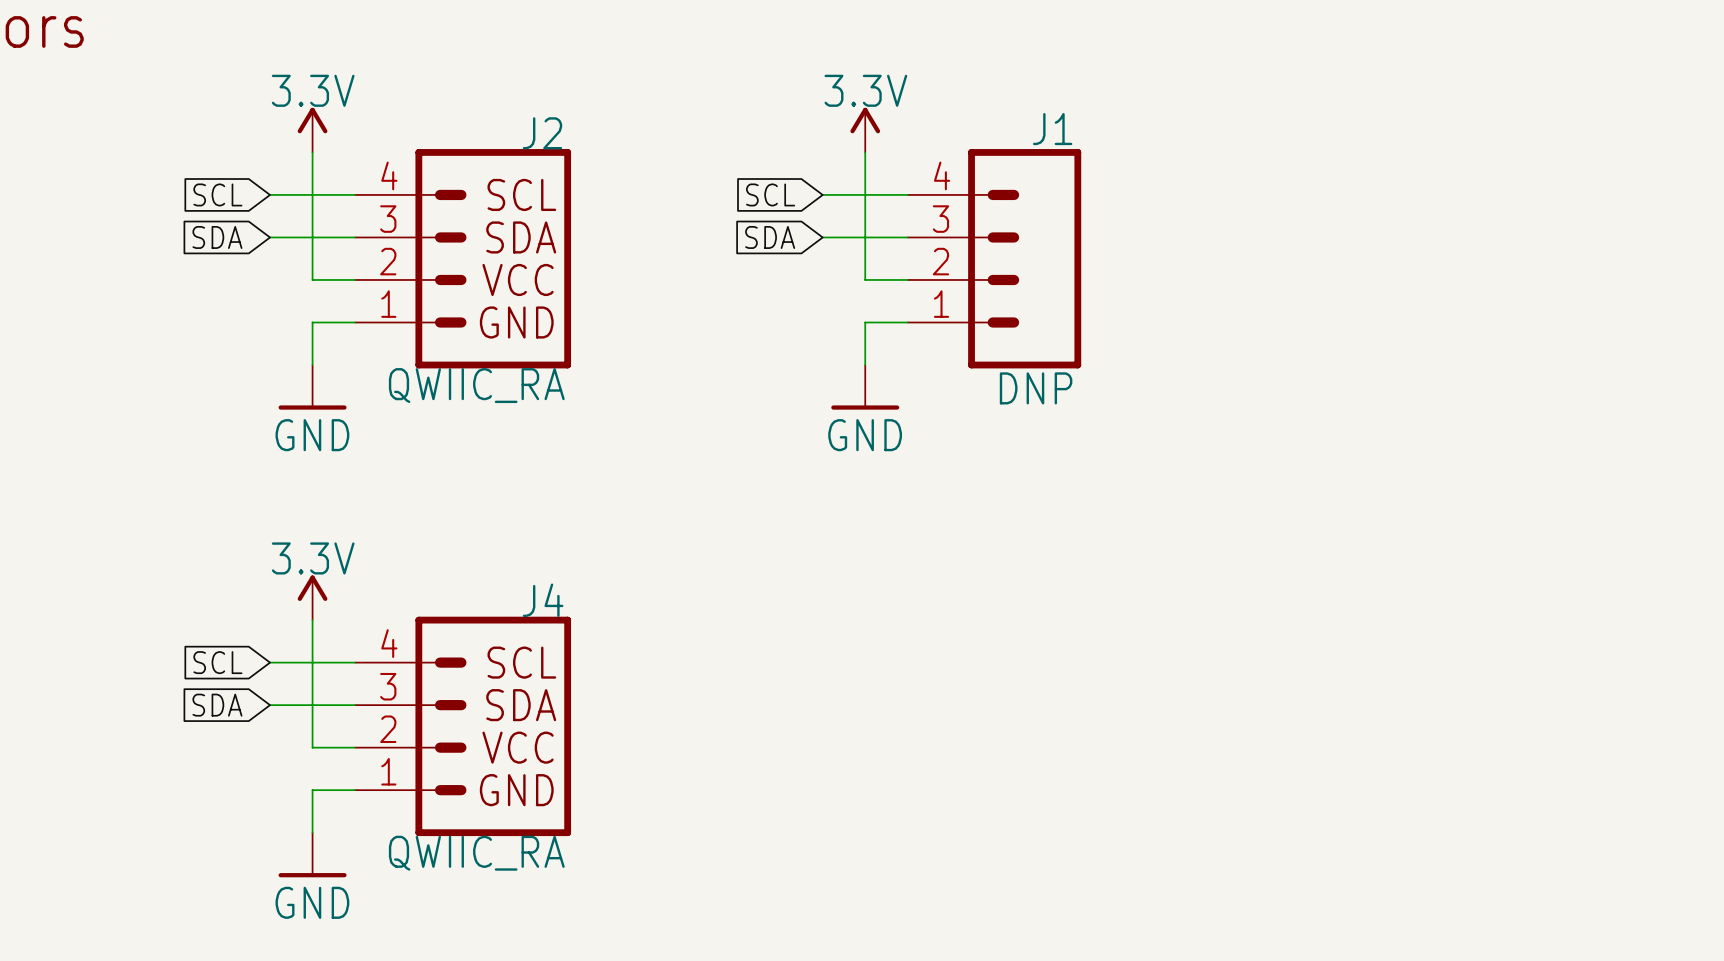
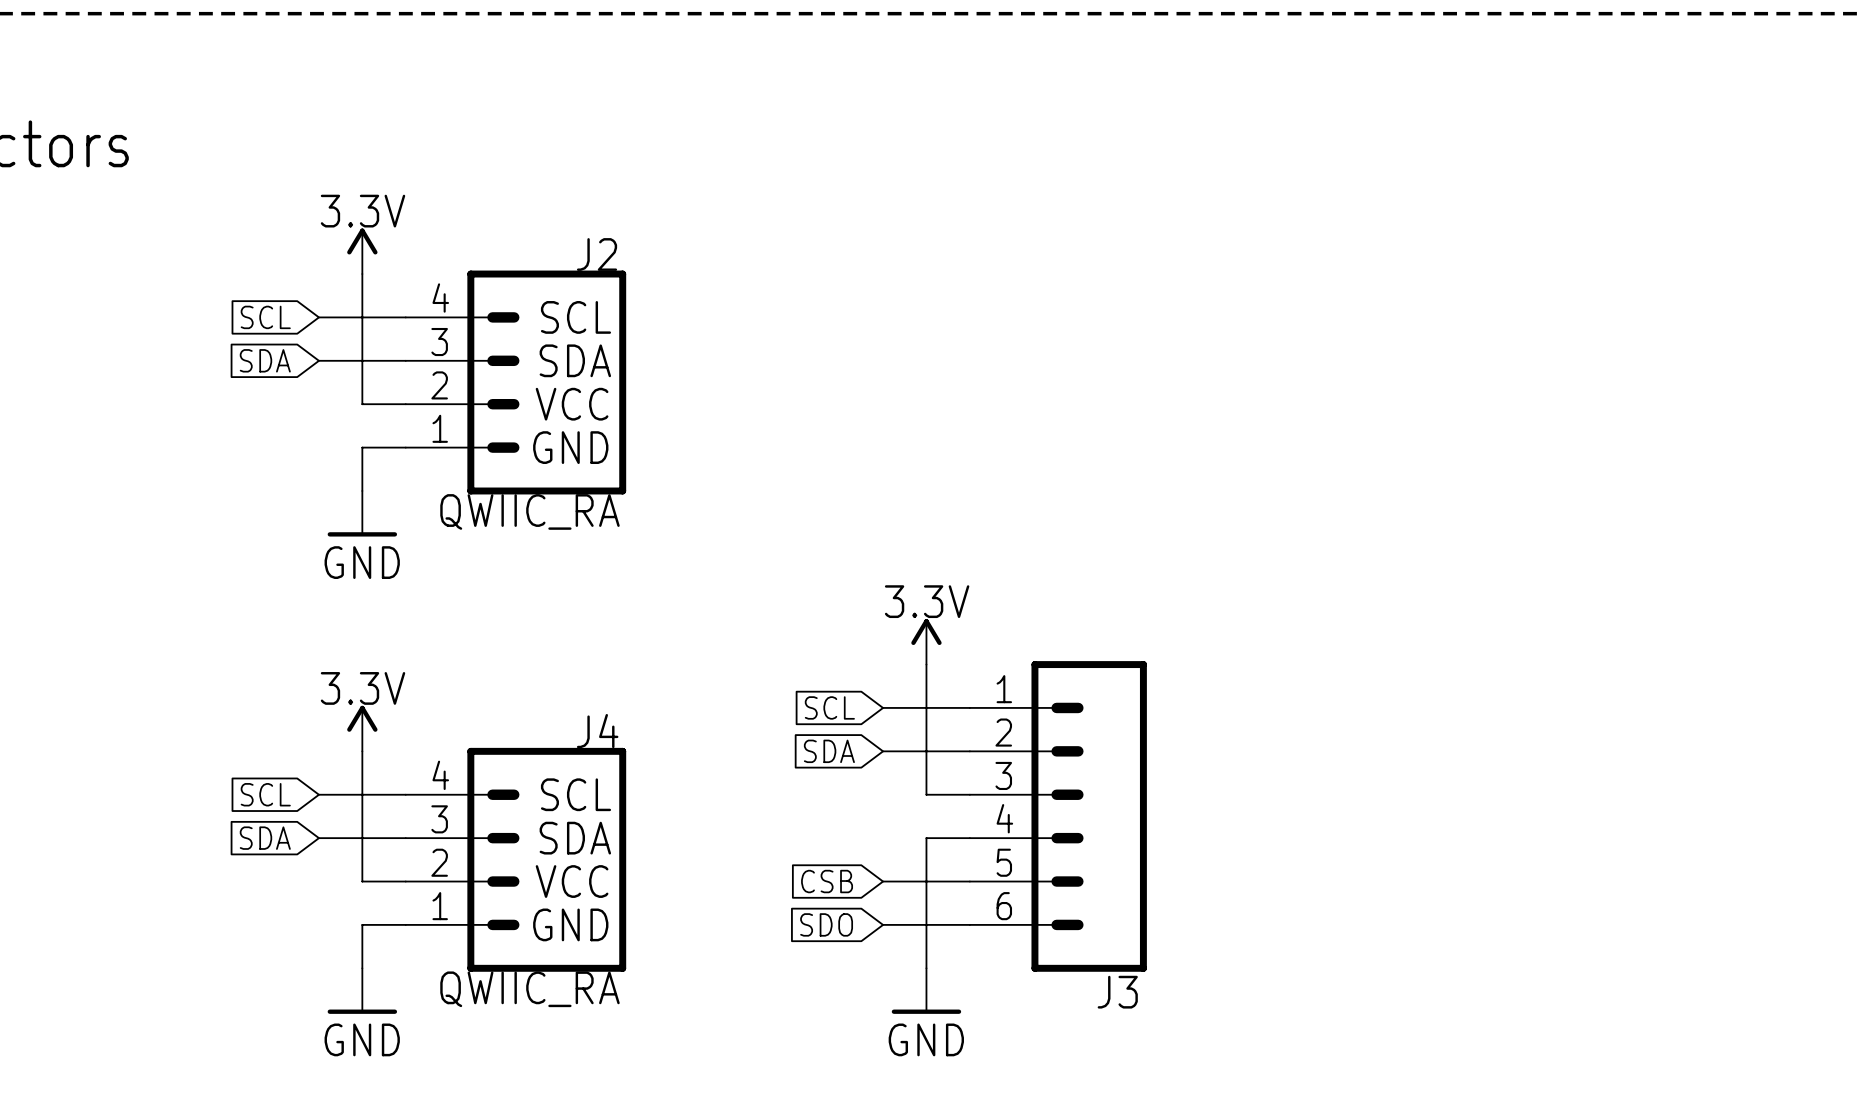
power symbol position: 3.3V (865, 130) -> 3.3V (926, 641)
wire: (865, 152) (865, 279) (907, 279) -> (926, 664) (926, 794) (969, 794)
global label position: SCL (770, 194) -> SCL (829, 707)
wire: (822, 194) (907, 194) -> (883, 707) (969, 707)
global label position: SDA (770, 237) -> SDA (829, 751)
wire: (822, 237) (907, 237) -> (883, 751) (969, 751)
J1: DNP (994, 258) -> none
wire: (907, 322) (865, 322) (865, 365) -> none
power symbol: GND (865, 387) -> none
J3: none -> (1058, 816)
wire: none -> (969, 838) (926, 838) (926, 968)
global label: none -> CSB (827, 881)
wire: none -> (883, 881) (969, 881)
global label: none -> SDO (826, 924)
wire: none -> (883, 924) (969, 924)
power symbol: none -> GND (926, 991)

